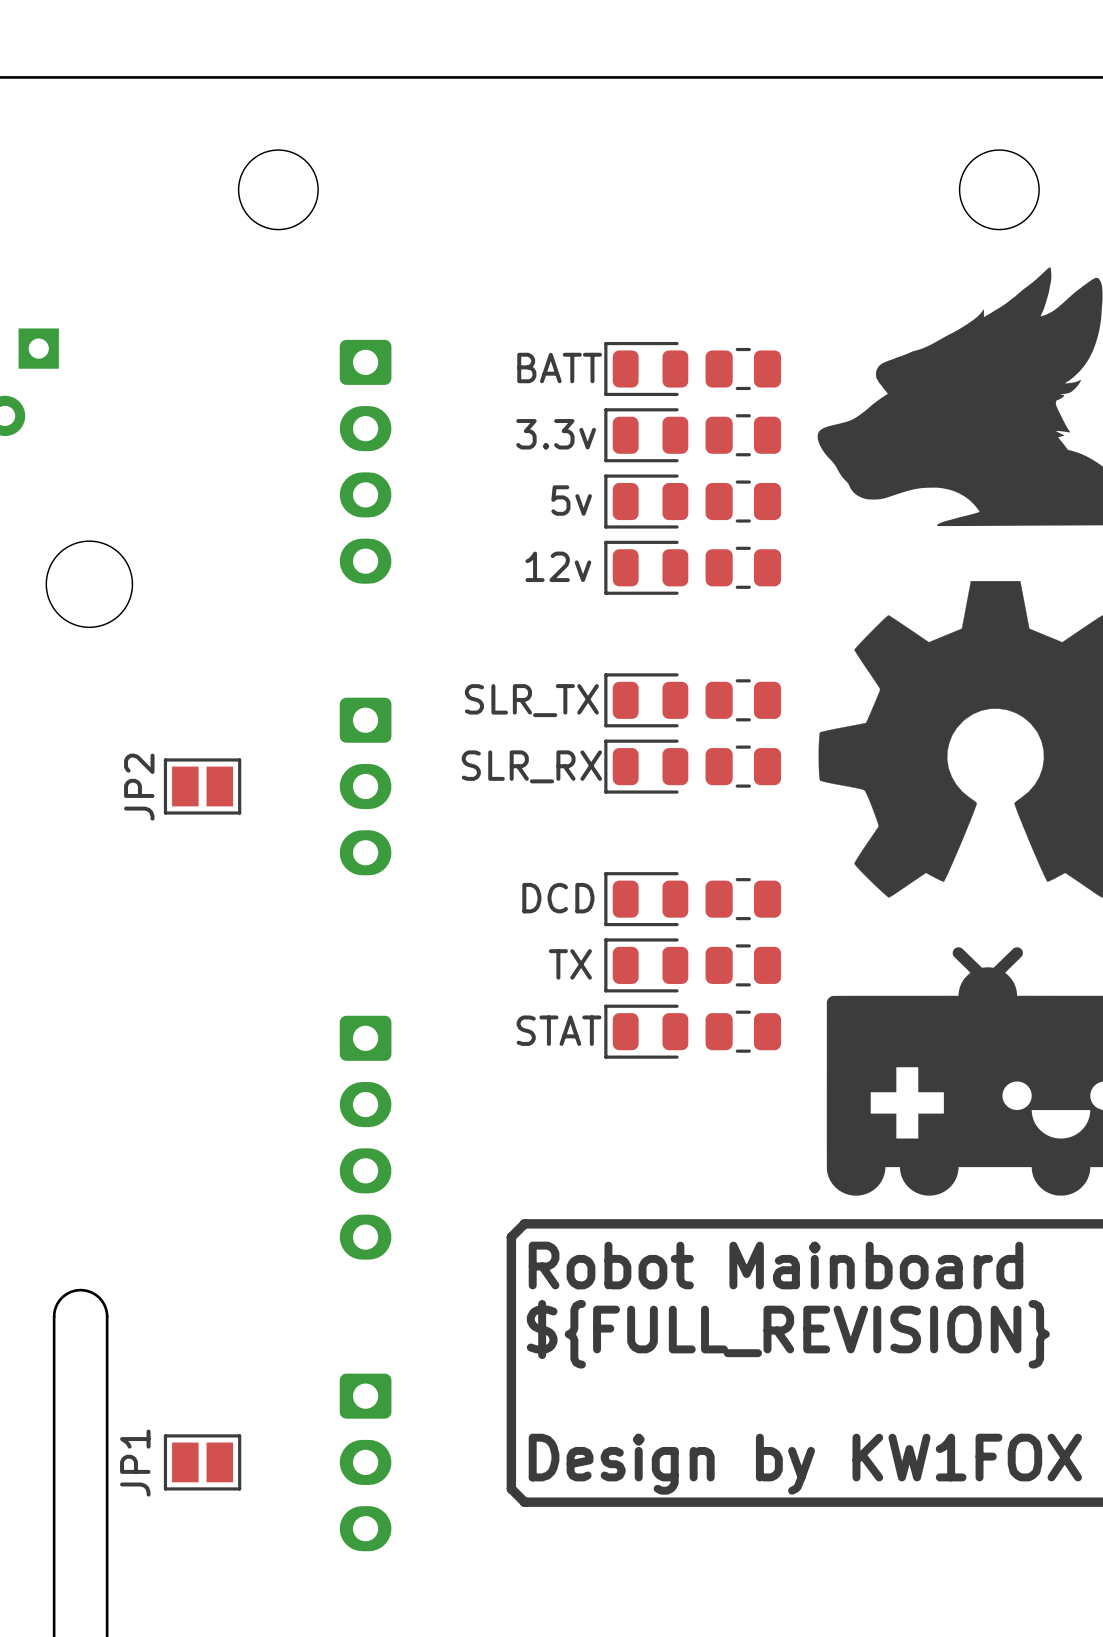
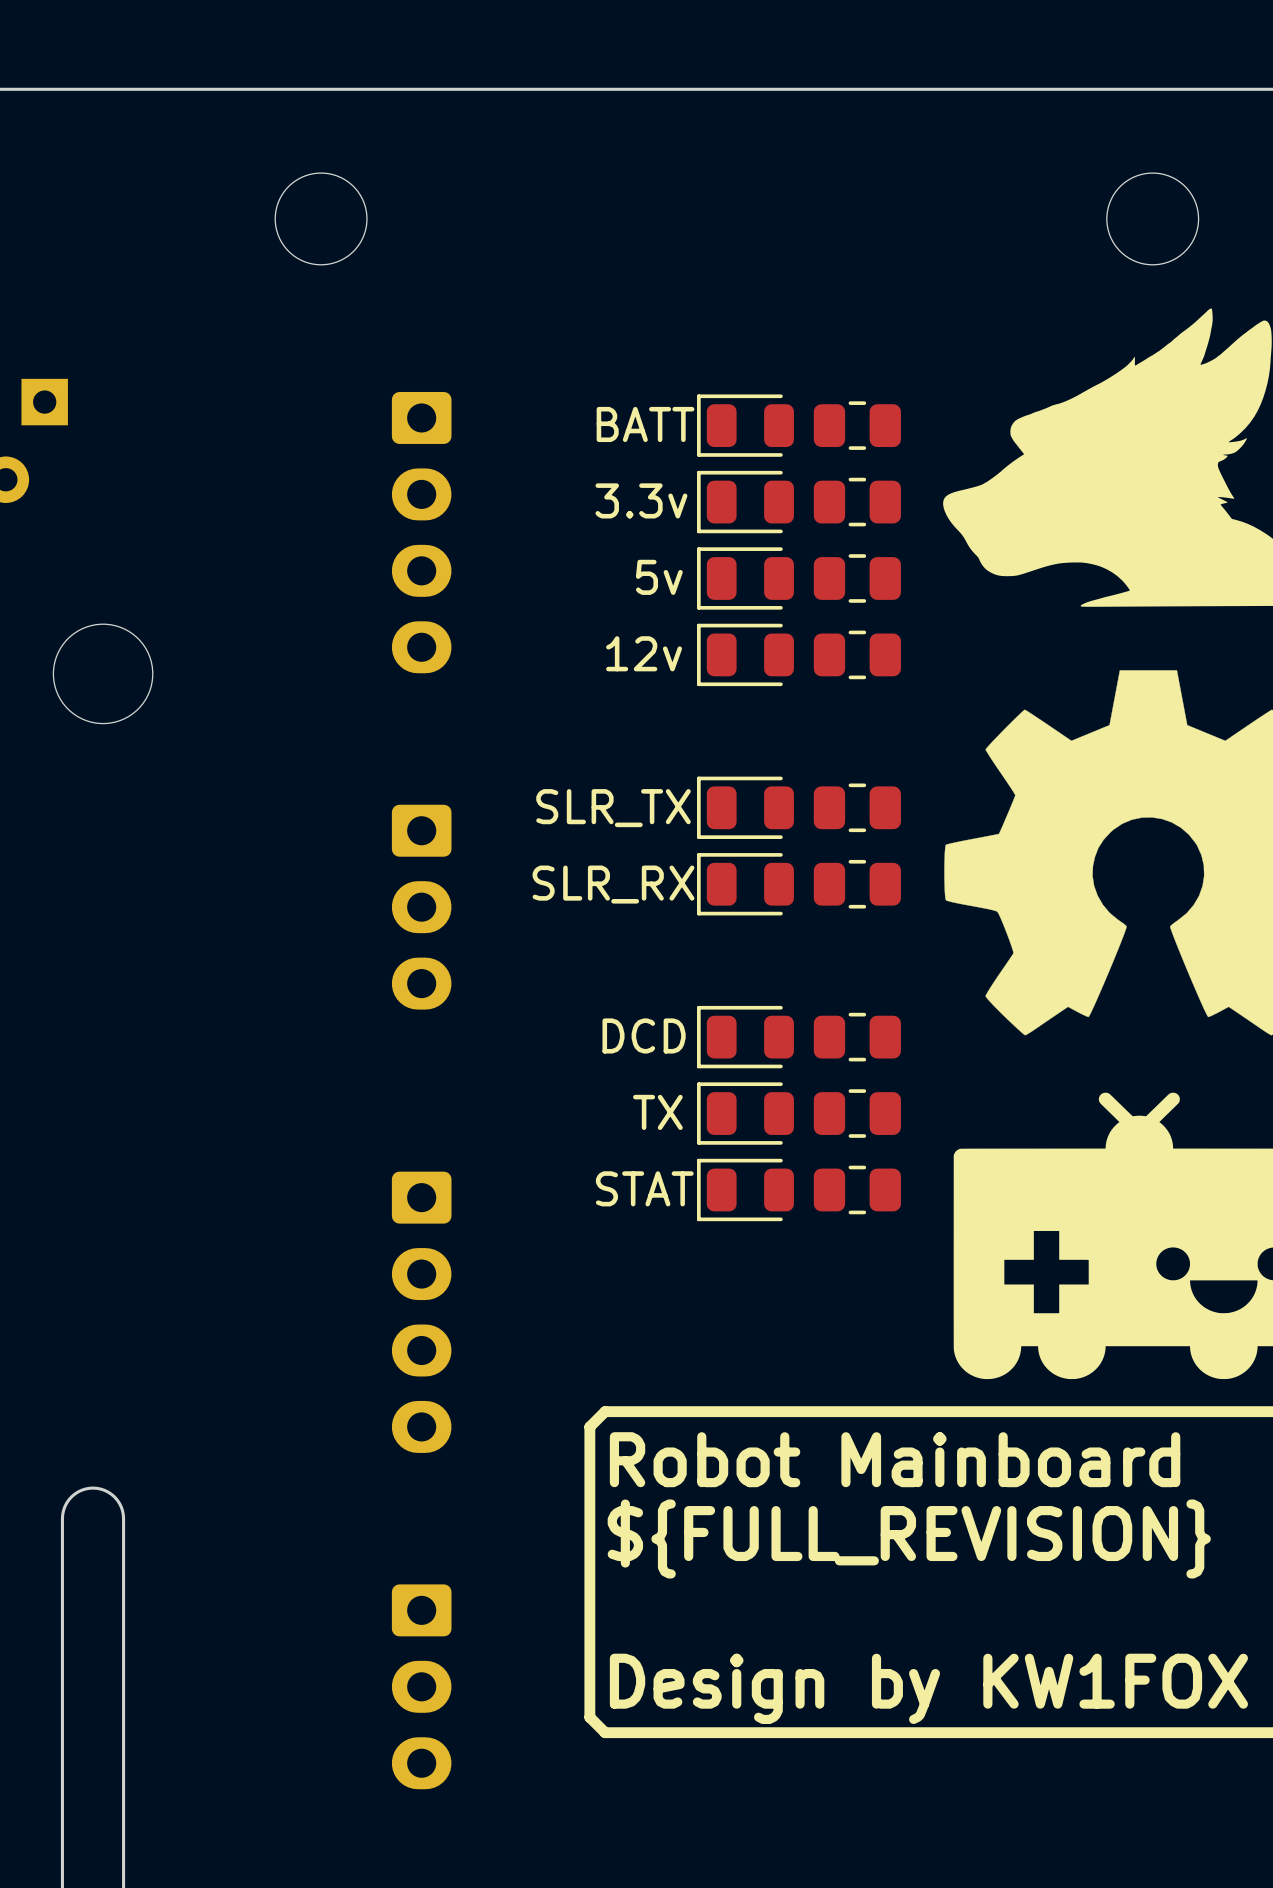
JP2: (202, 786) -> none
JP1: (202, 1462) -> none

